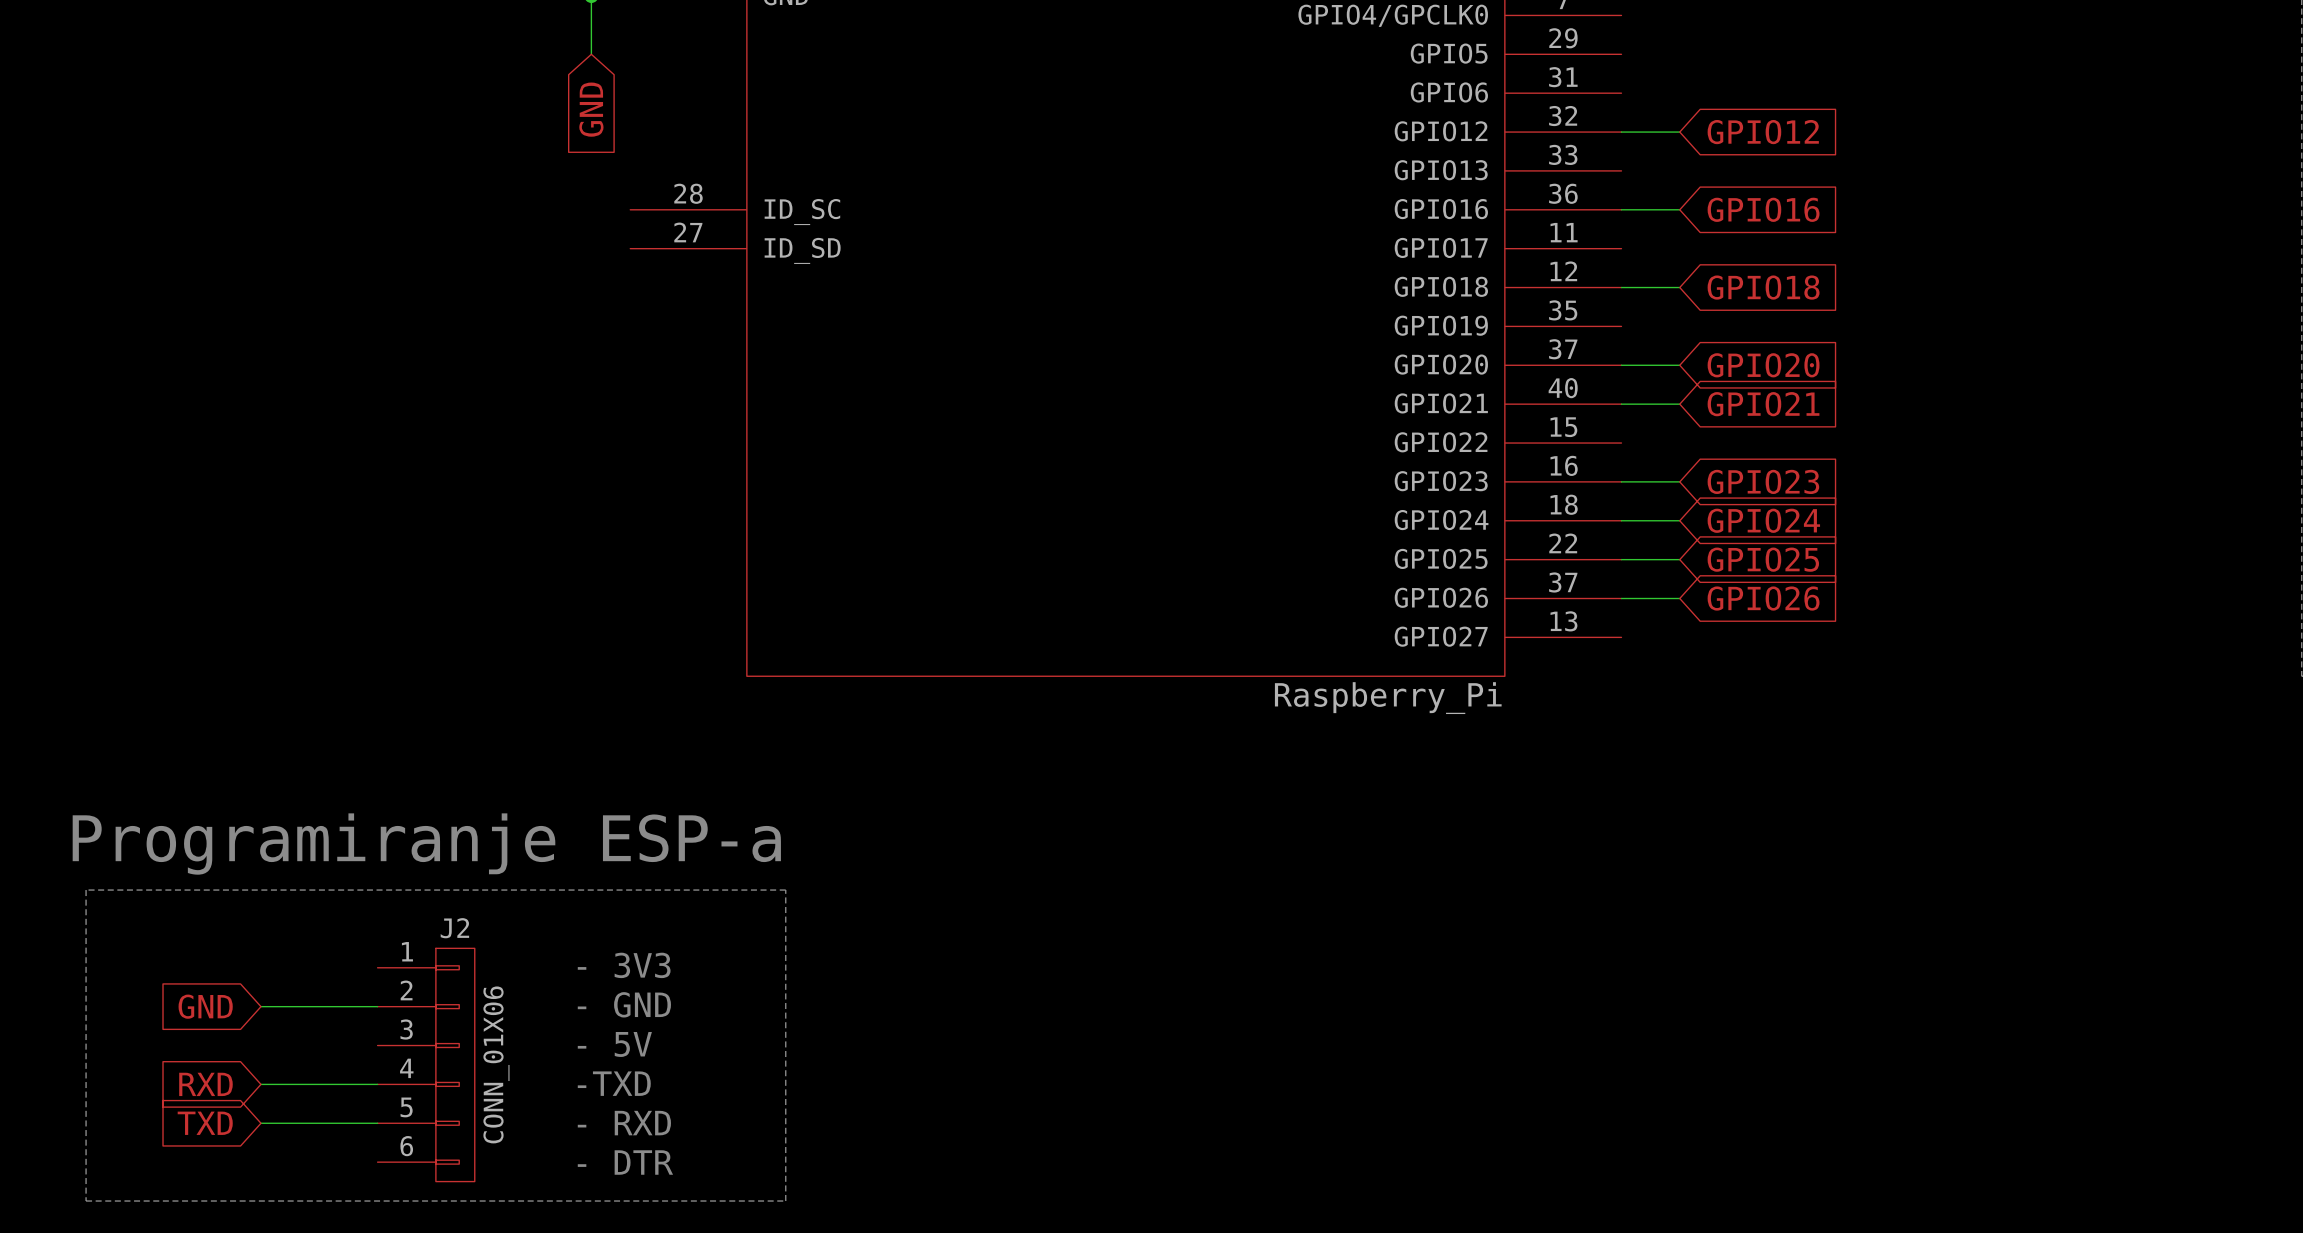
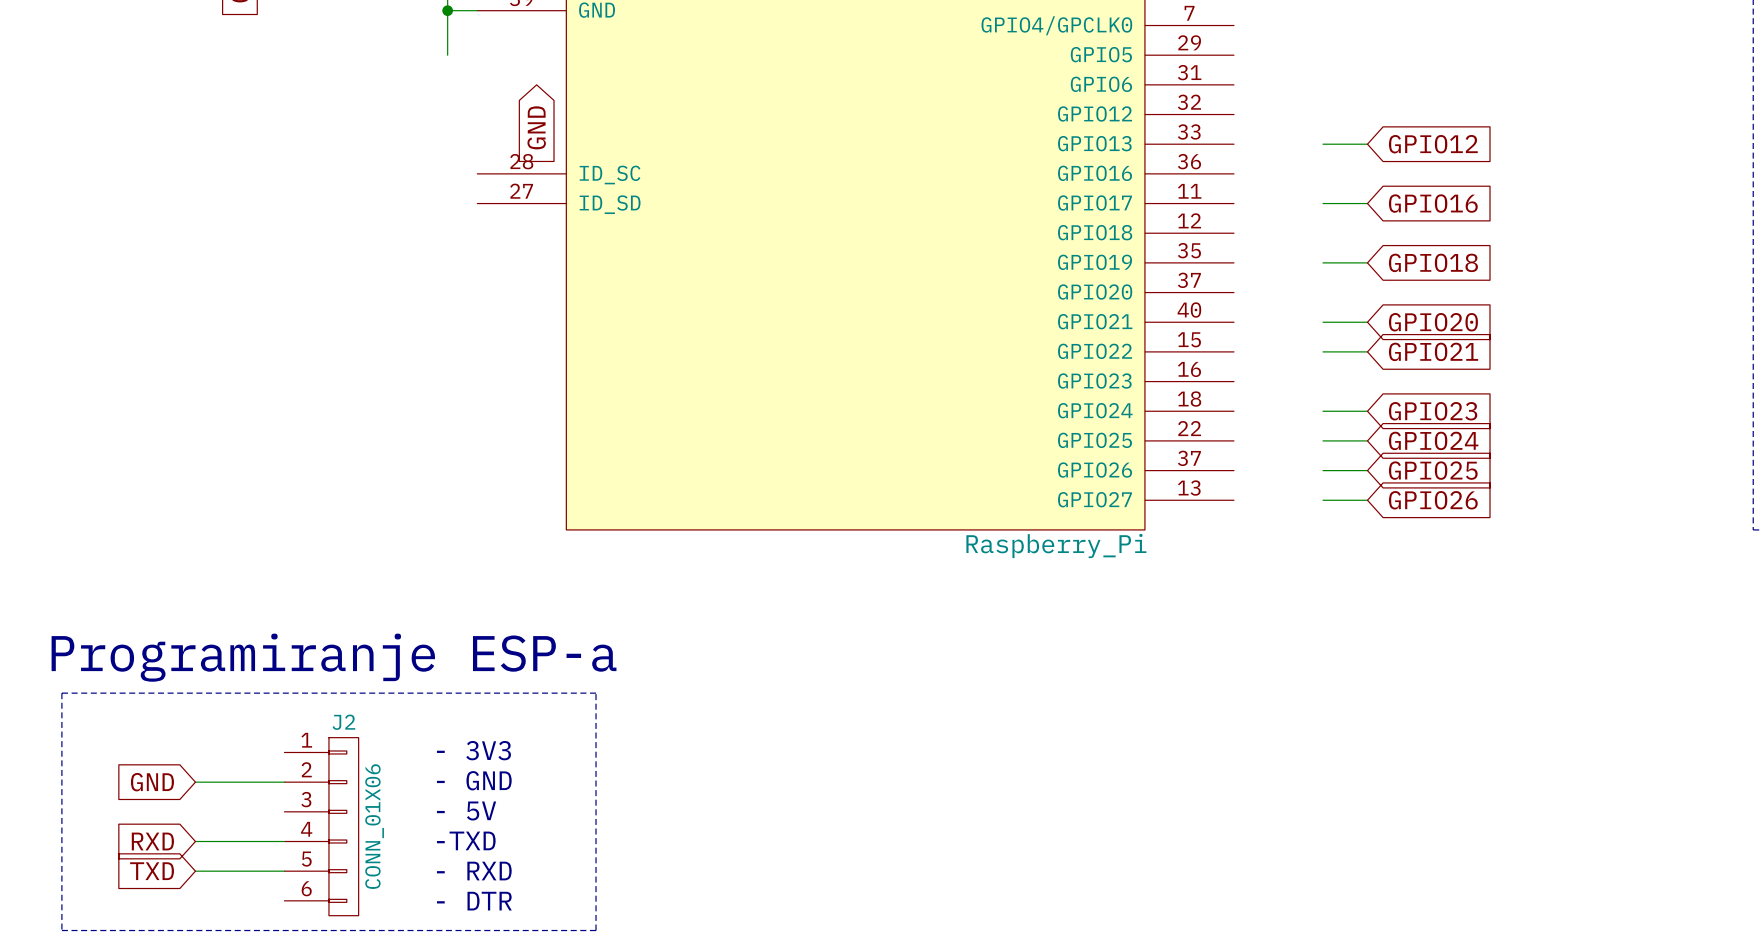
global label position: GND (591, 109) -> GND (536, 127)
wire: (1621, 132) (1679, 132) -> (1322, 144) (1367, 144)
global label position: GPIO12 (1763, 132) -> GPIO12 (1433, 144)
wire: (1621, 209) (1679, 209) -> (1322, 203) (1367, 203)
global label position: GPIO16 (1763, 209) -> GPIO16 (1433, 203)
wire: (1621, 287) (1679, 287) -> (1322, 262) (1367, 262)
global label position: GPIO18 (1763, 287) -> GPIO18 (1433, 262)
wire: (1621, 365) (1679, 365) -> (1322, 322) (1367, 322)
global label position: GPIO20 (1763, 365) -> GPIO20 (1433, 322)
wire: (1621, 404) (1679, 404) -> (1322, 351) (1367, 351)
global label position: GPIO21 (1763, 404) -> GPIO21 (1433, 351)
wire: (1621, 481) (1679, 481) -> (1322, 411) (1367, 411)
global label position: GPIO23 (1763, 481) -> GPIO23 (1433, 411)
wire: (1621, 520) (1679, 520) -> (1322, 440) (1367, 440)
global label position: GPIO24 (1763, 520) -> GPIO24 (1433, 440)
wire: (1621, 559) (1679, 559) -> (1322, 470) (1367, 470)
global label position: GPIO25 (1763, 559) -> GPIO25 (1433, 470)
wire: (1621, 598) (1679, 598) -> (1322, 500) (1367, 500)
global label position: GPIO26 (1763, 598) -> GPIO26 (1433, 500)

